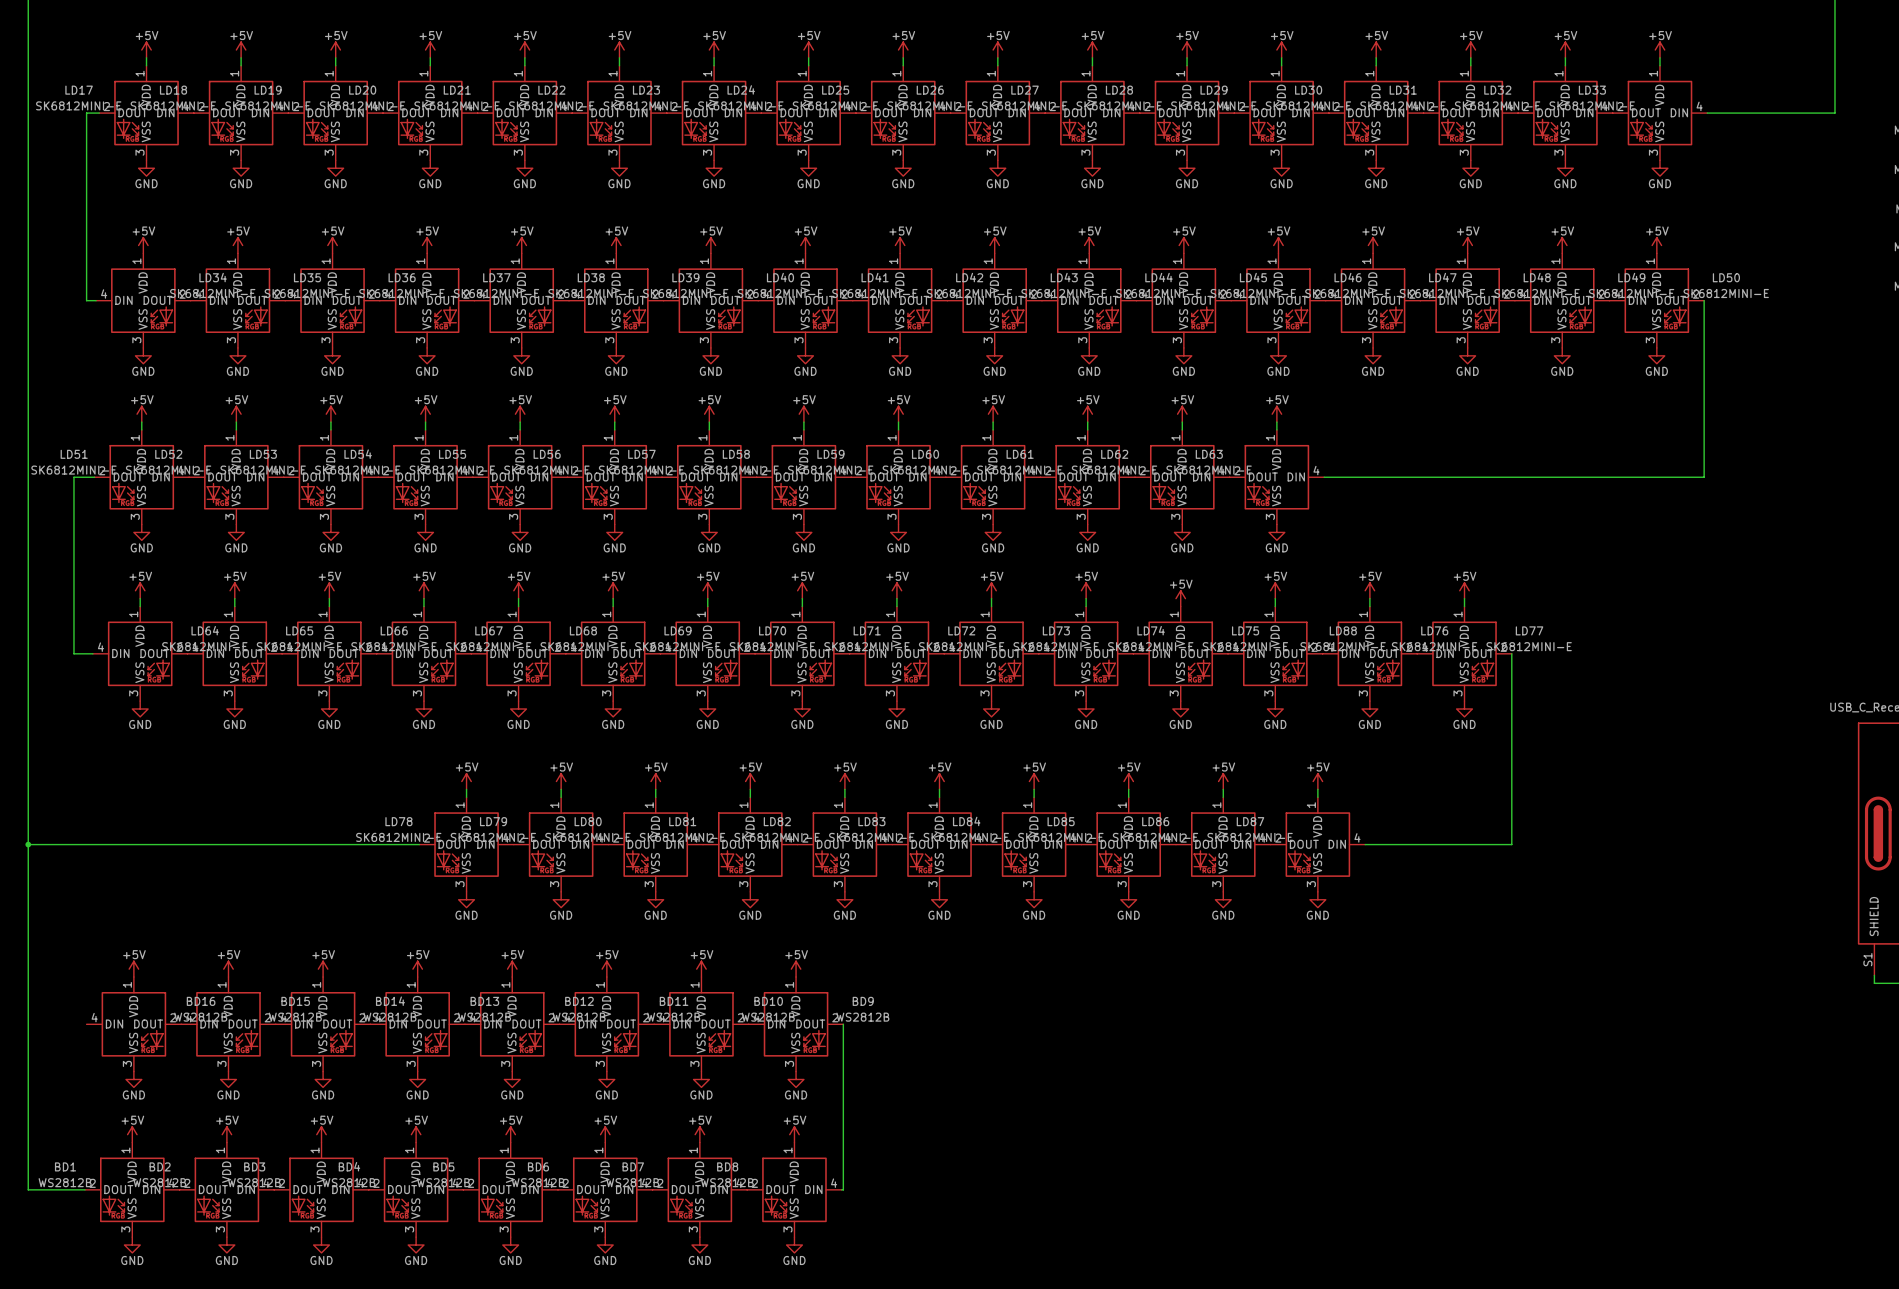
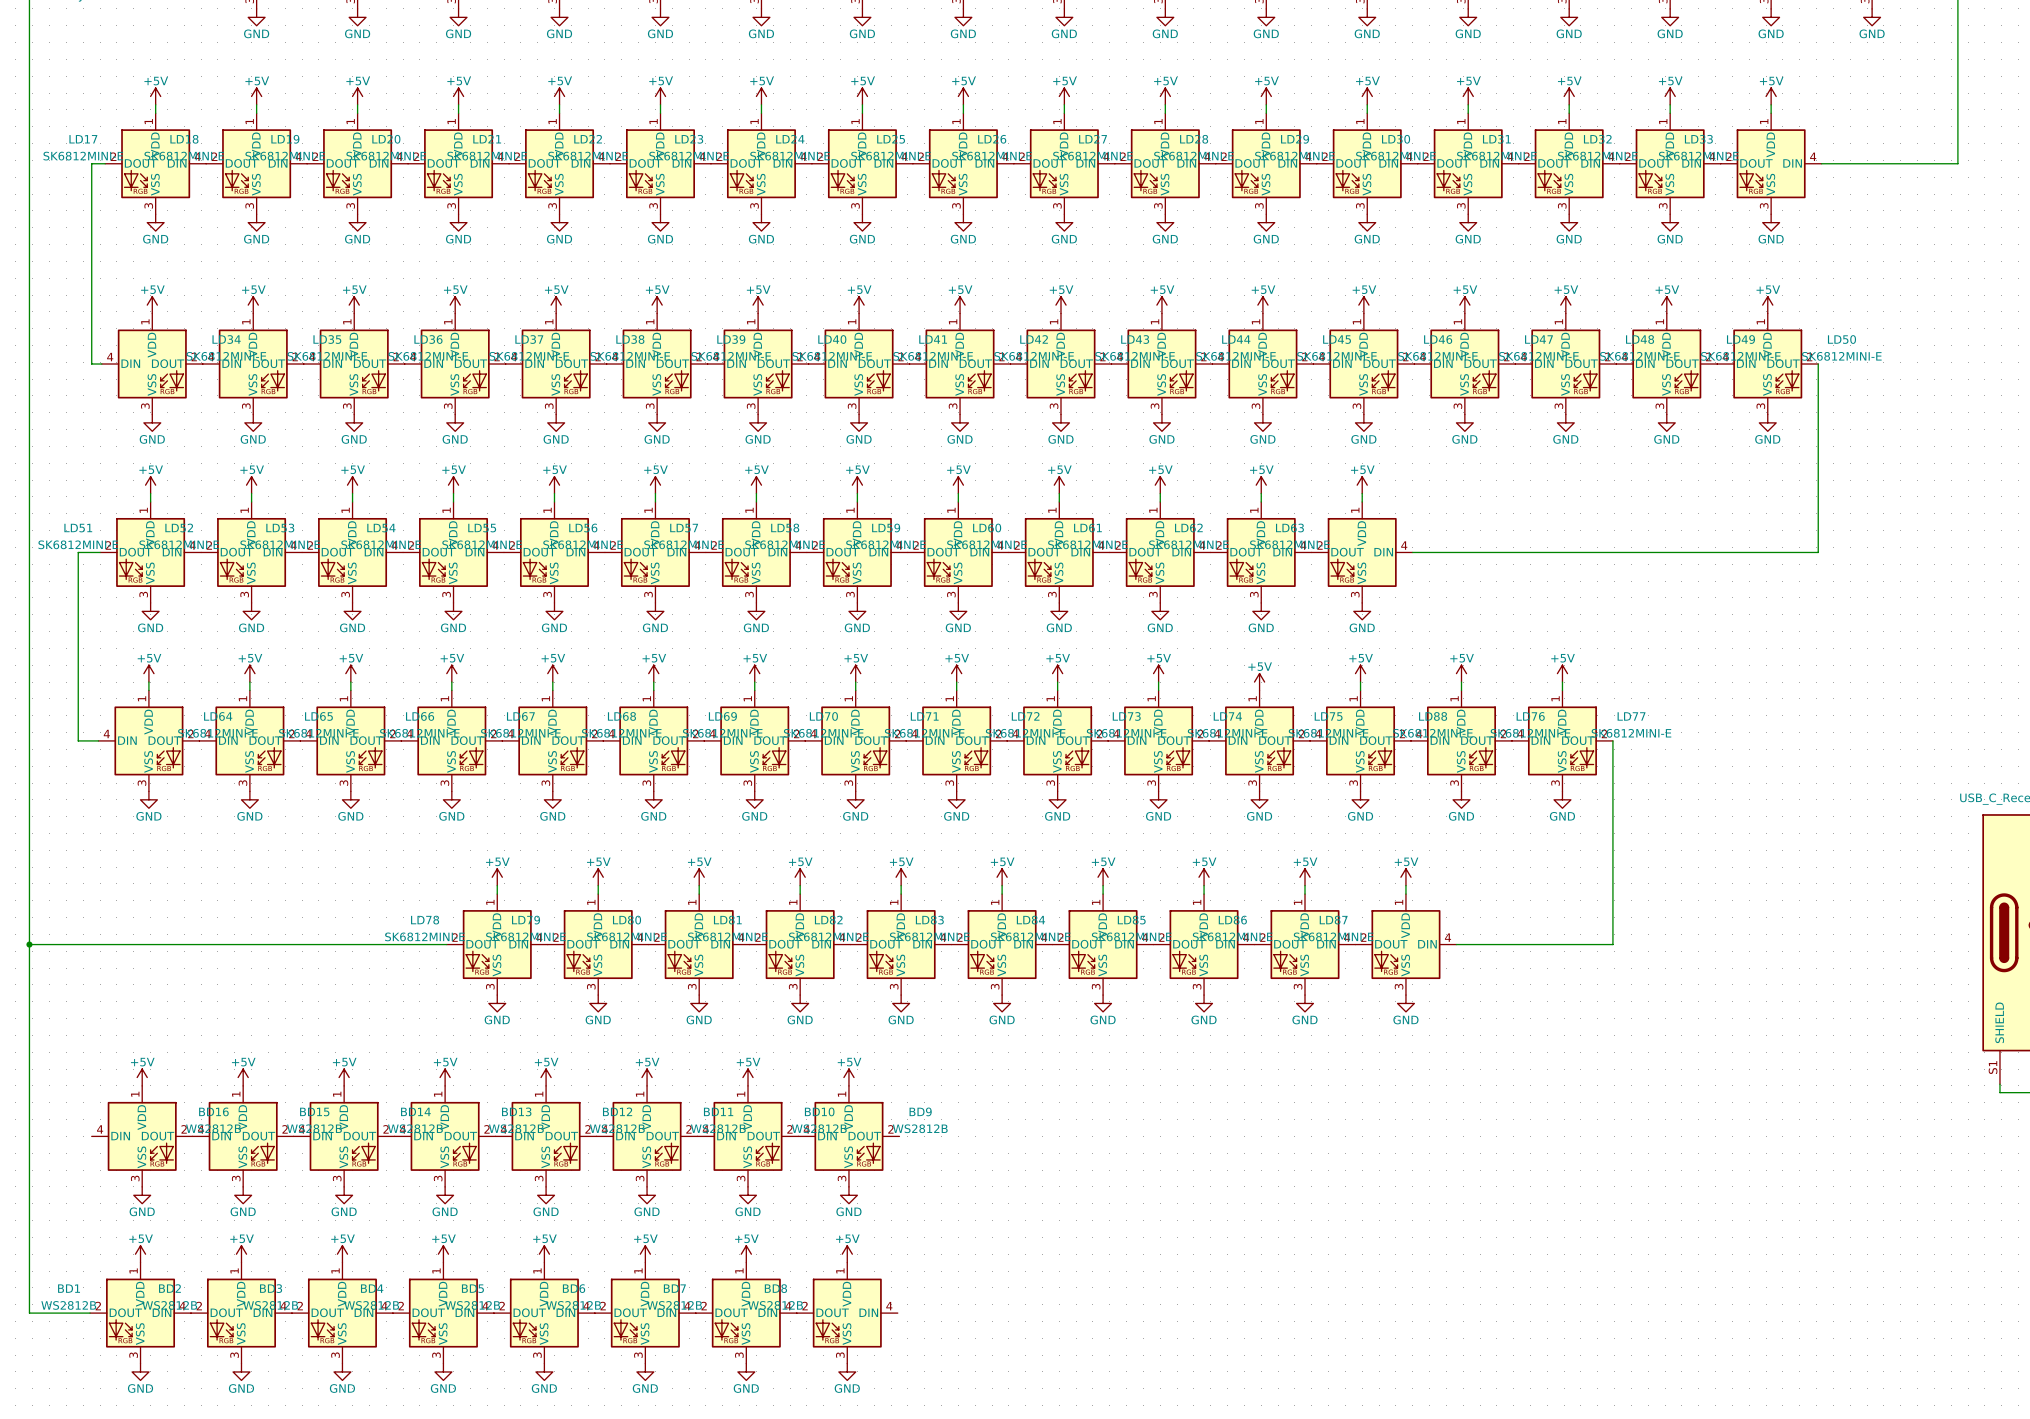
wire: (843, 1024) (843, 1189) (841, 1189) -> none

